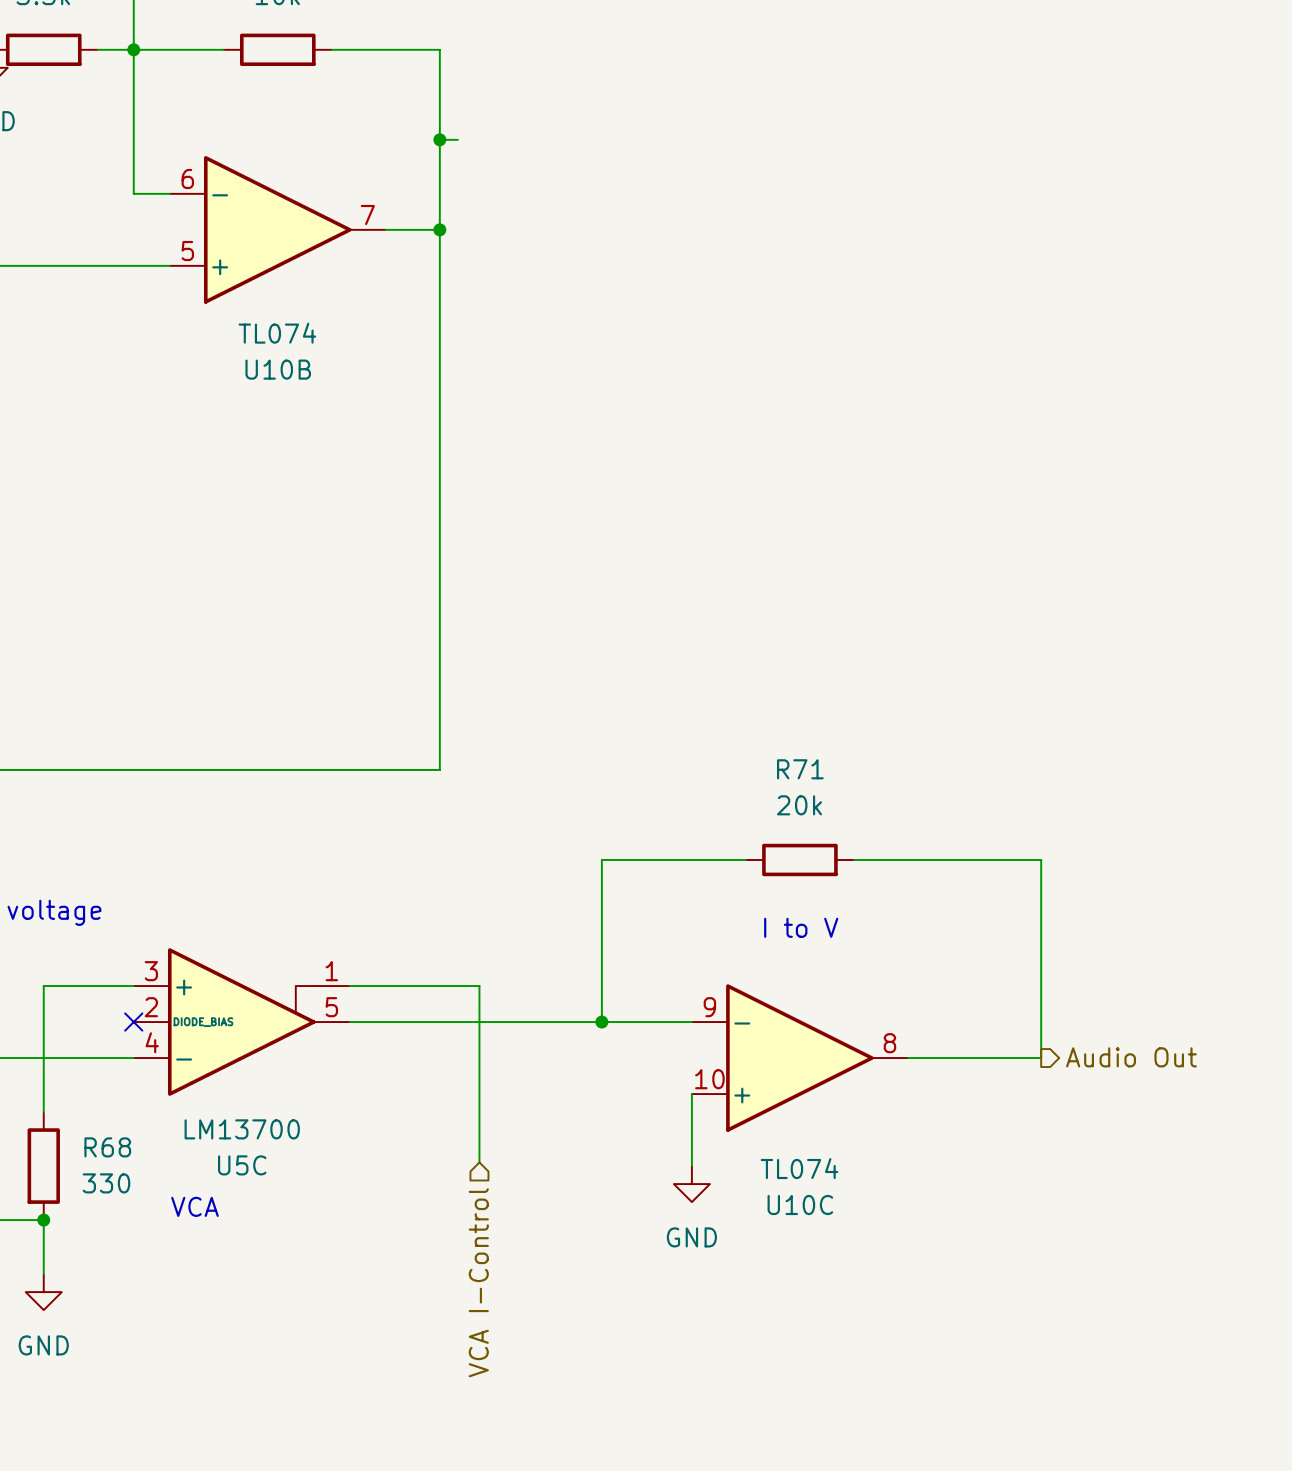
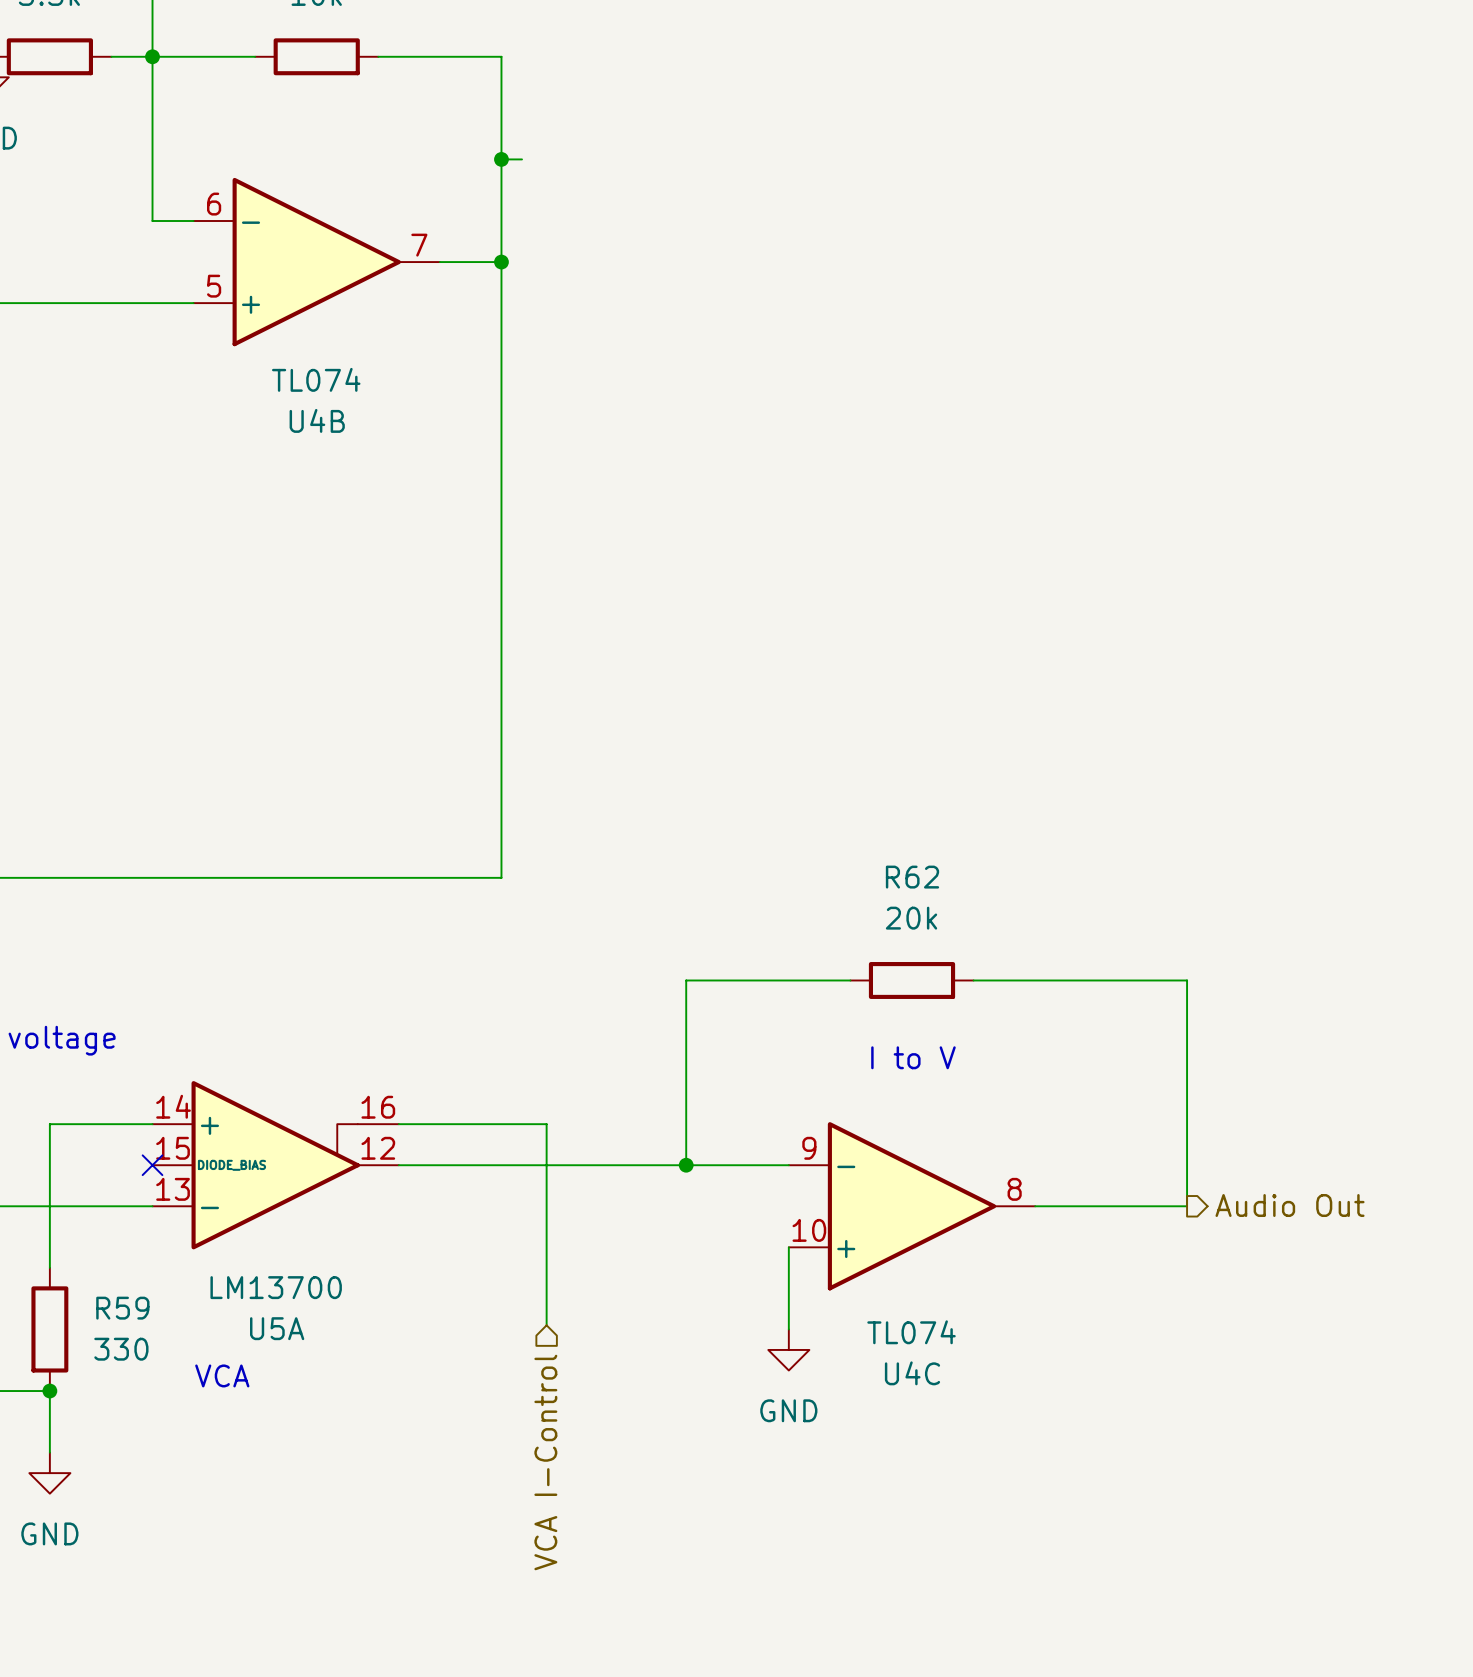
U10B name: U10B (278, 369) -> U4B (317, 420)
R71 name: R71 (800, 769) -> R62 (912, 877)
U5C pin number: 3 (151, 971) -> 14 (173, 1106)
U5C pin number: 1 (331, 971) -> 16 (378, 1107)
U5C pin number: 2 (151, 1007) -> 15 (173, 1148)
U5C pin number: 5 (331, 1007) -> 12 (378, 1148)
U5C pin number: 4 (152, 1042) -> 13 (173, 1189)
R68 name: R68 (107, 1147) -> R59 (122, 1308)
U5C name: U5C (242, 1165) -> U5A (277, 1328)
U10C name: U10C (800, 1205) -> U4C (912, 1373)

